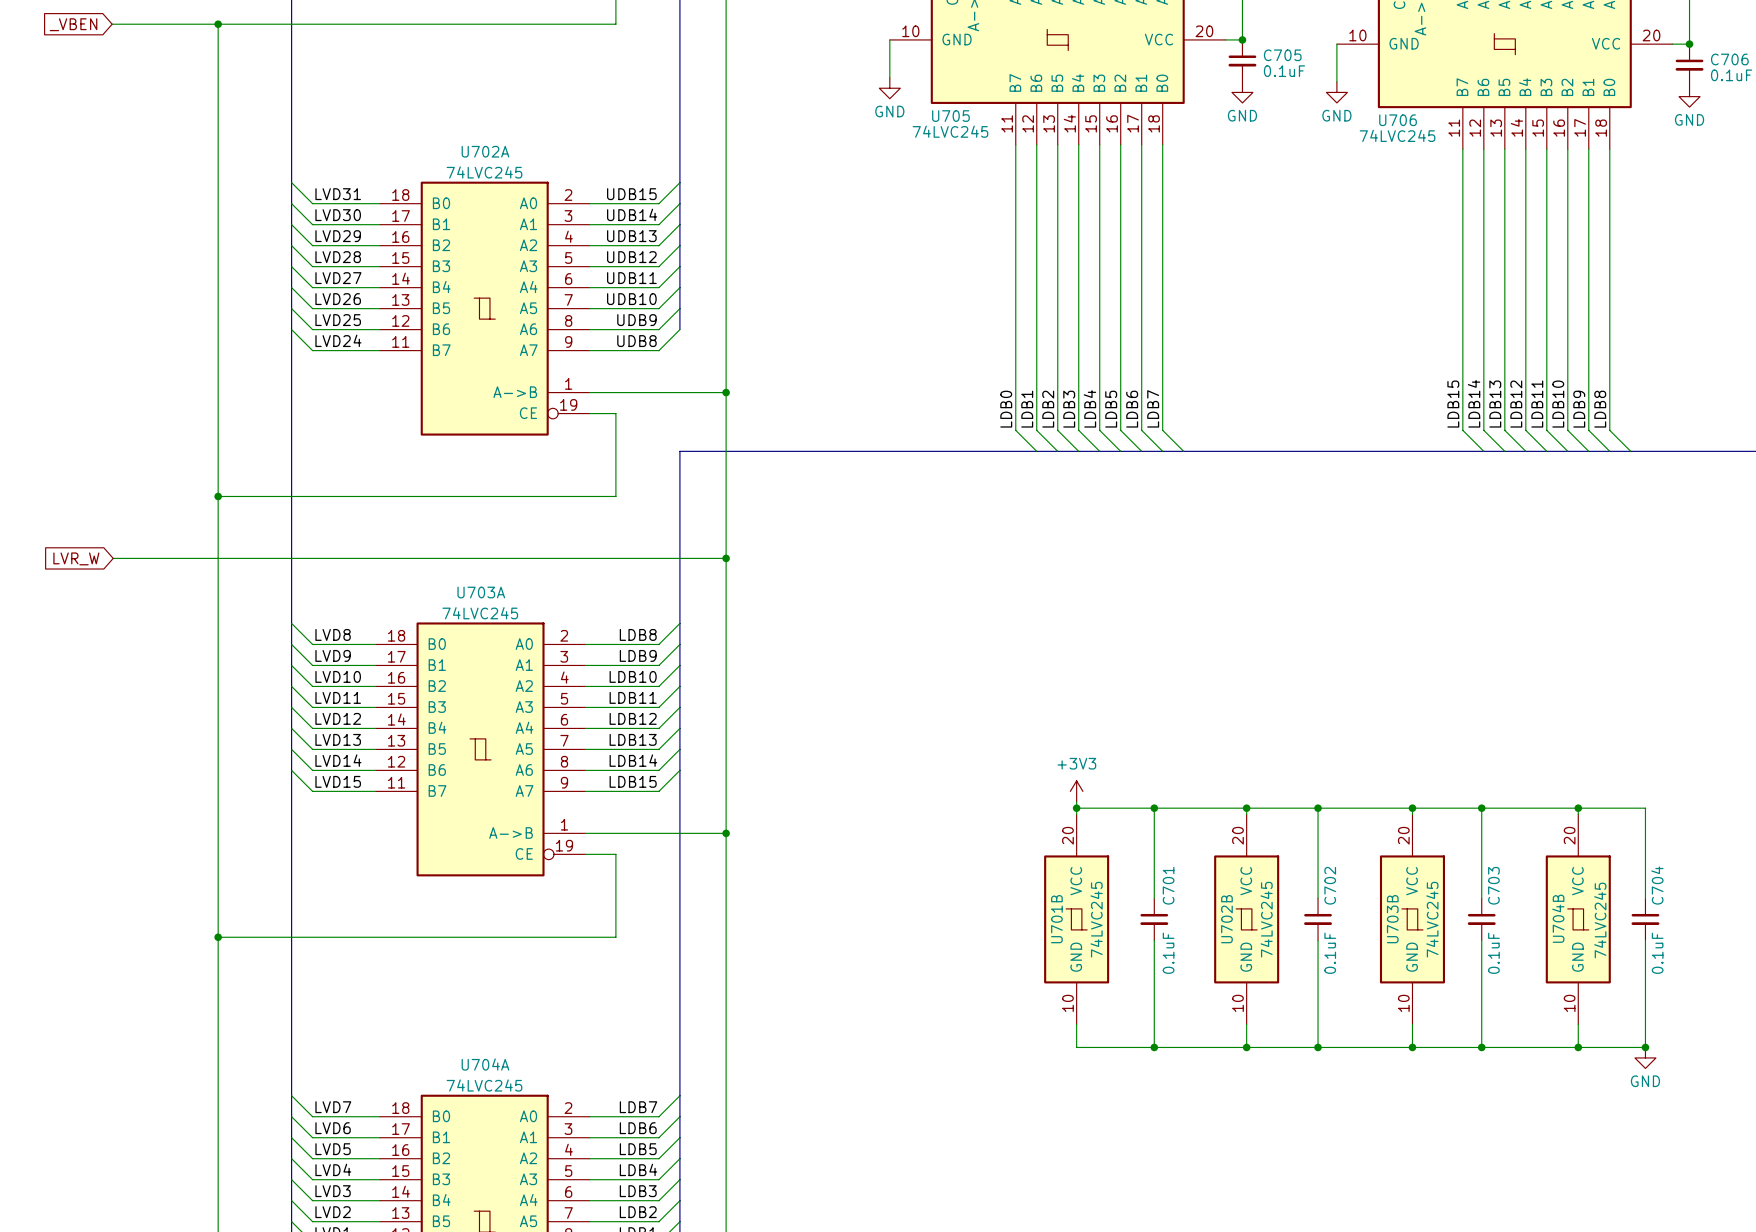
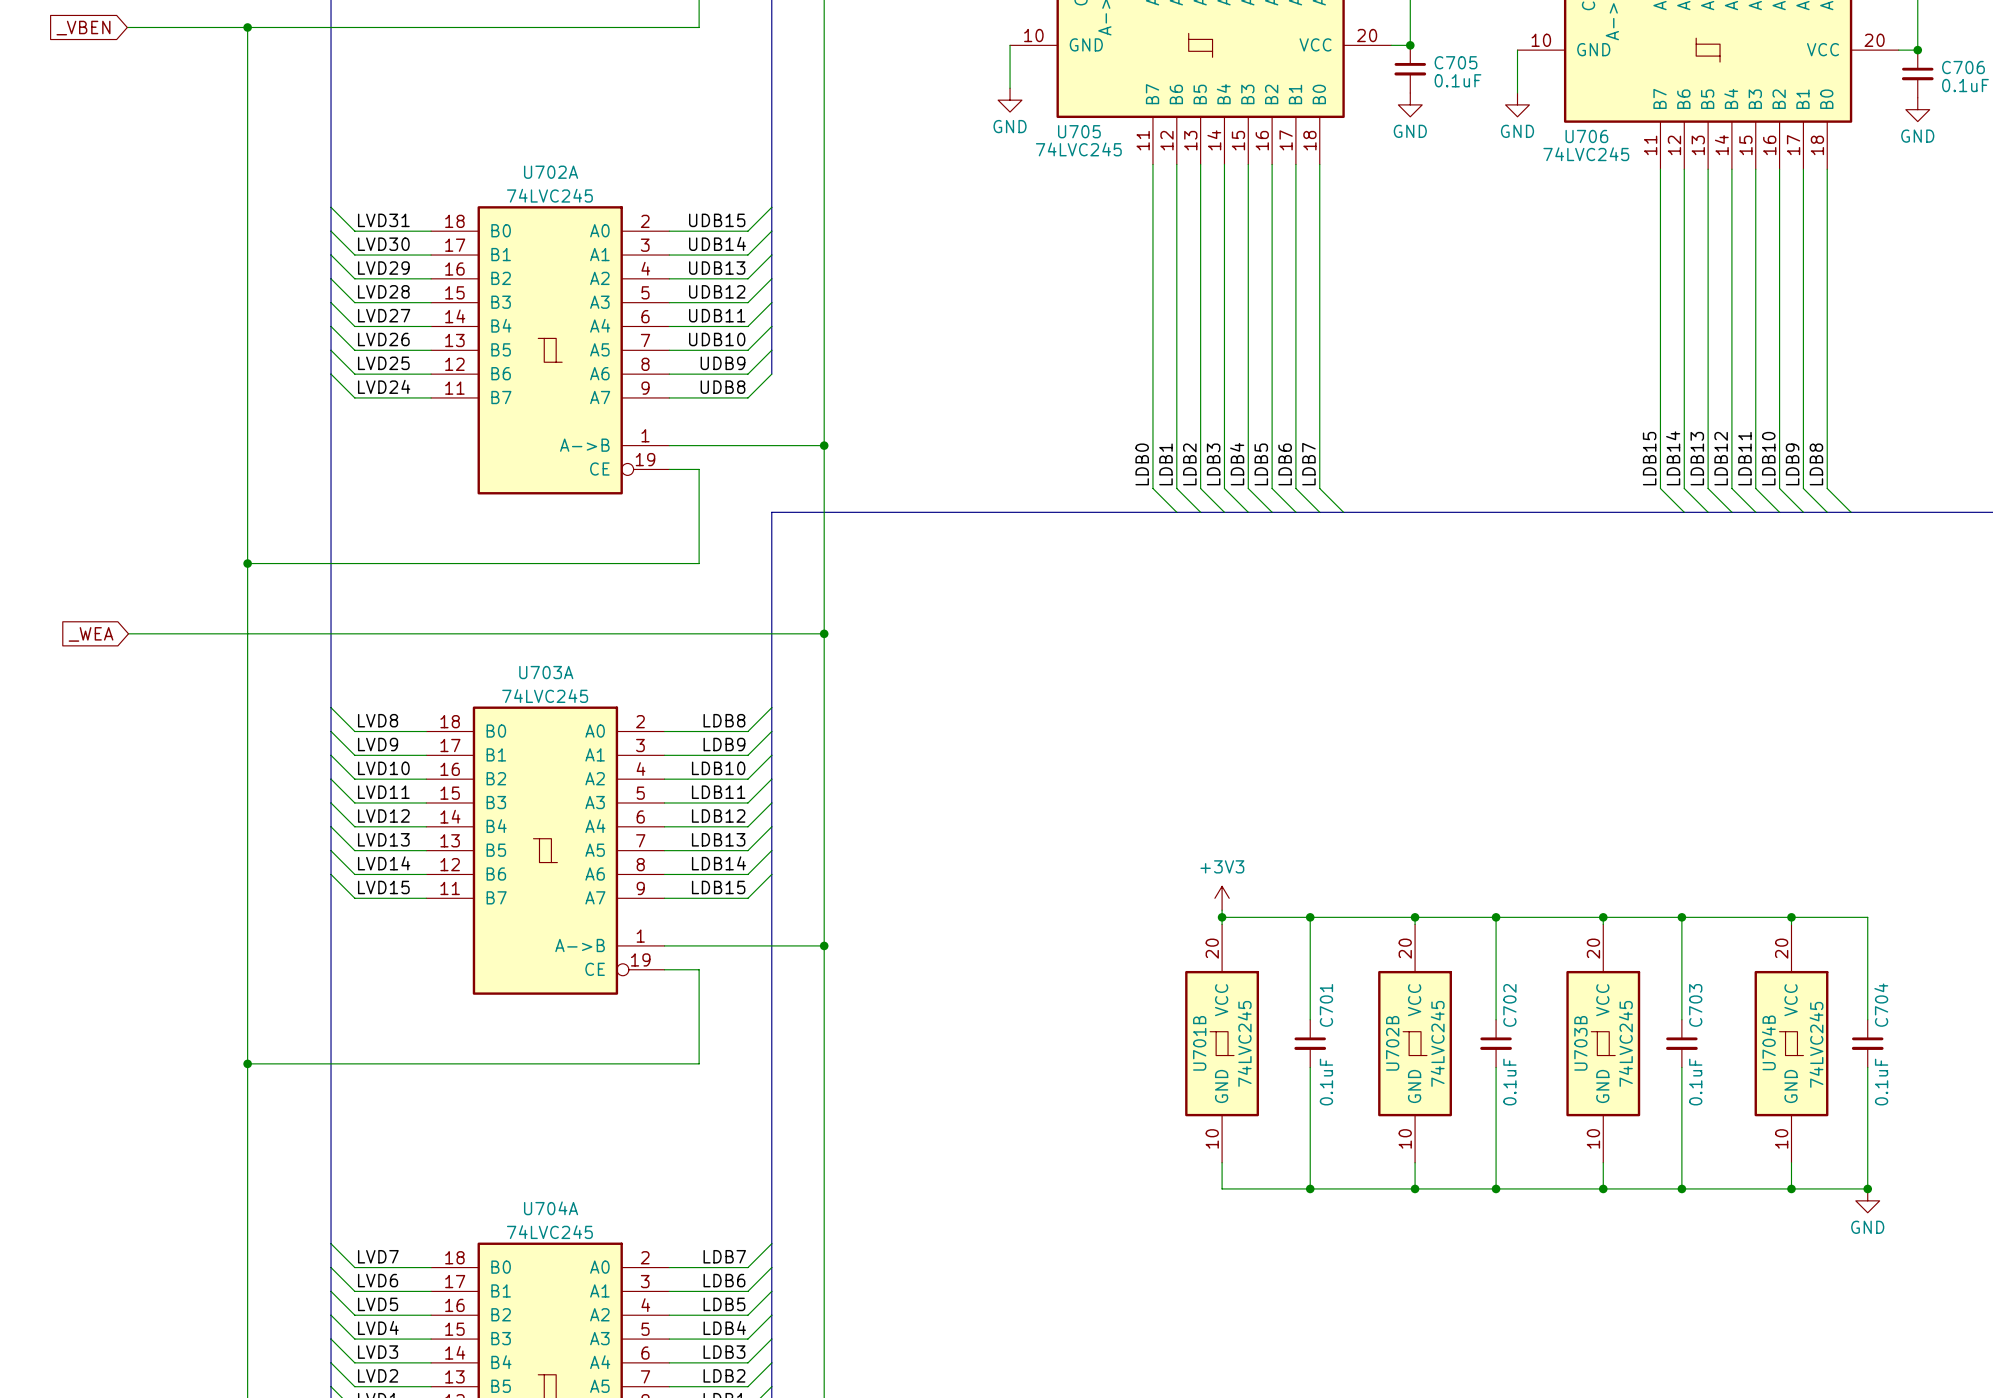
global label: LVR_W (76, 558) -> _WEA (91, 634)

